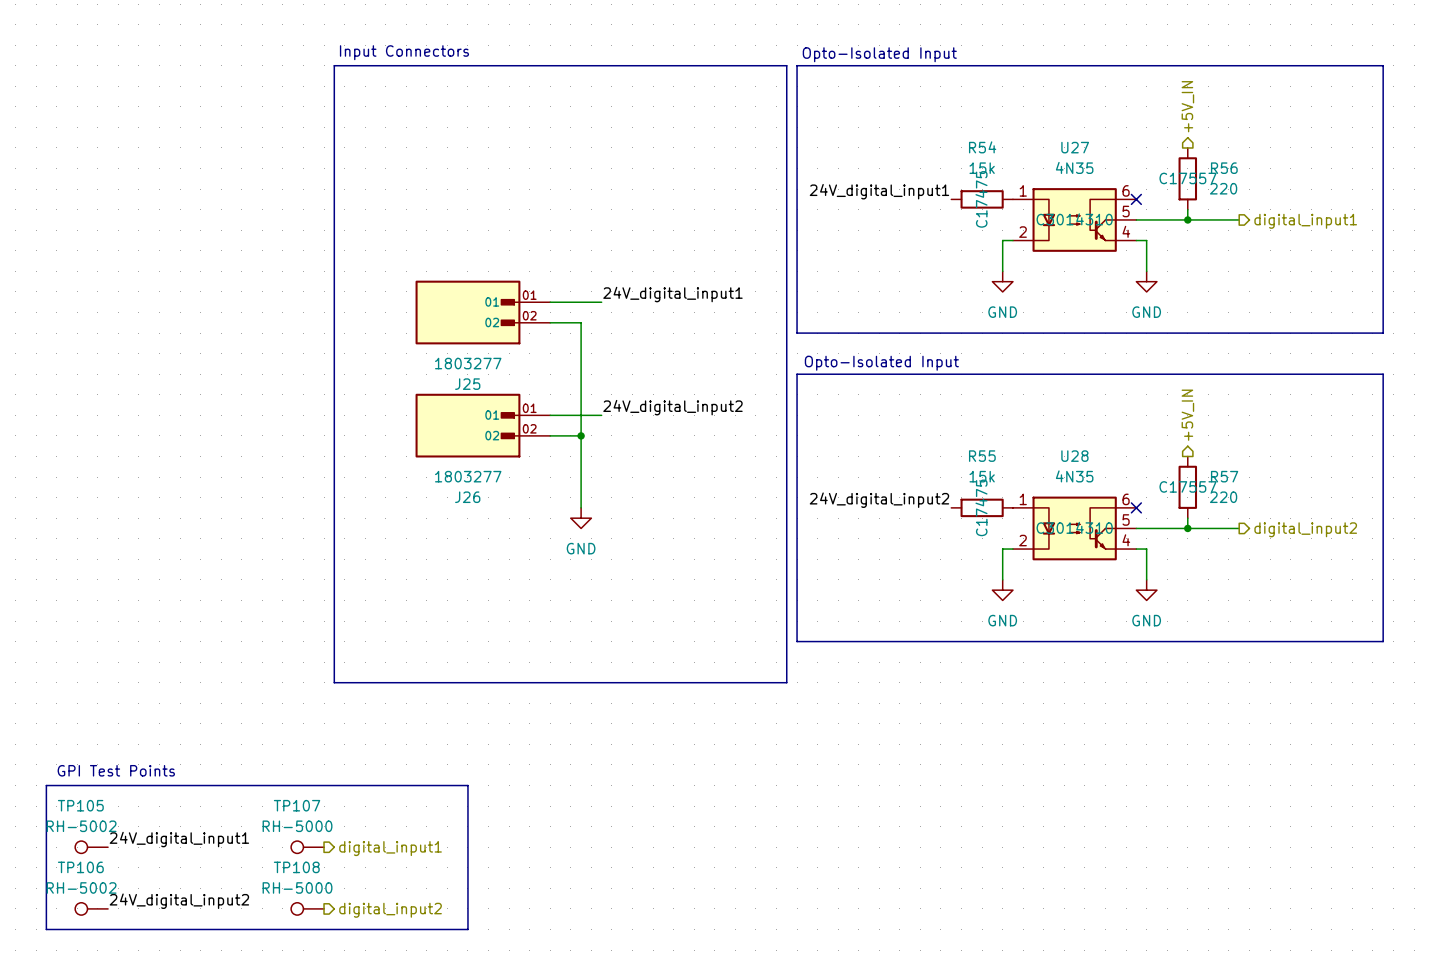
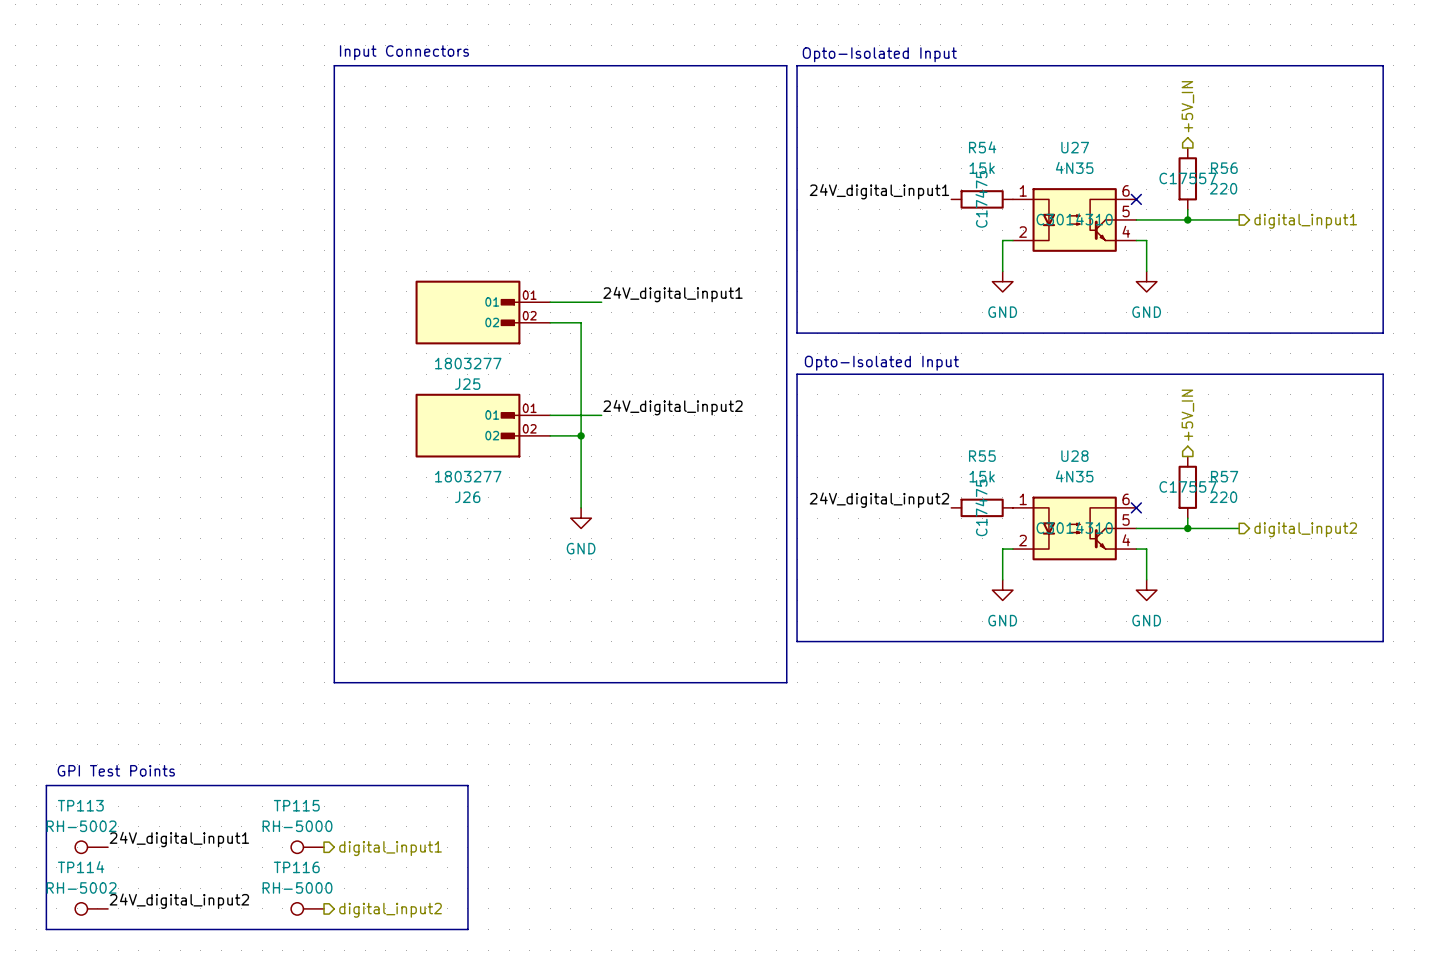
TP105 name: TP105 (80, 805) -> TP113 (80, 805)
TP107 name: TP107 (297, 805) -> TP115 (296, 805)
TP106 name: TP106 (80, 867) -> TP114 (81, 867)
TP108 name: TP108 (296, 867) -> TP116 (296, 867)

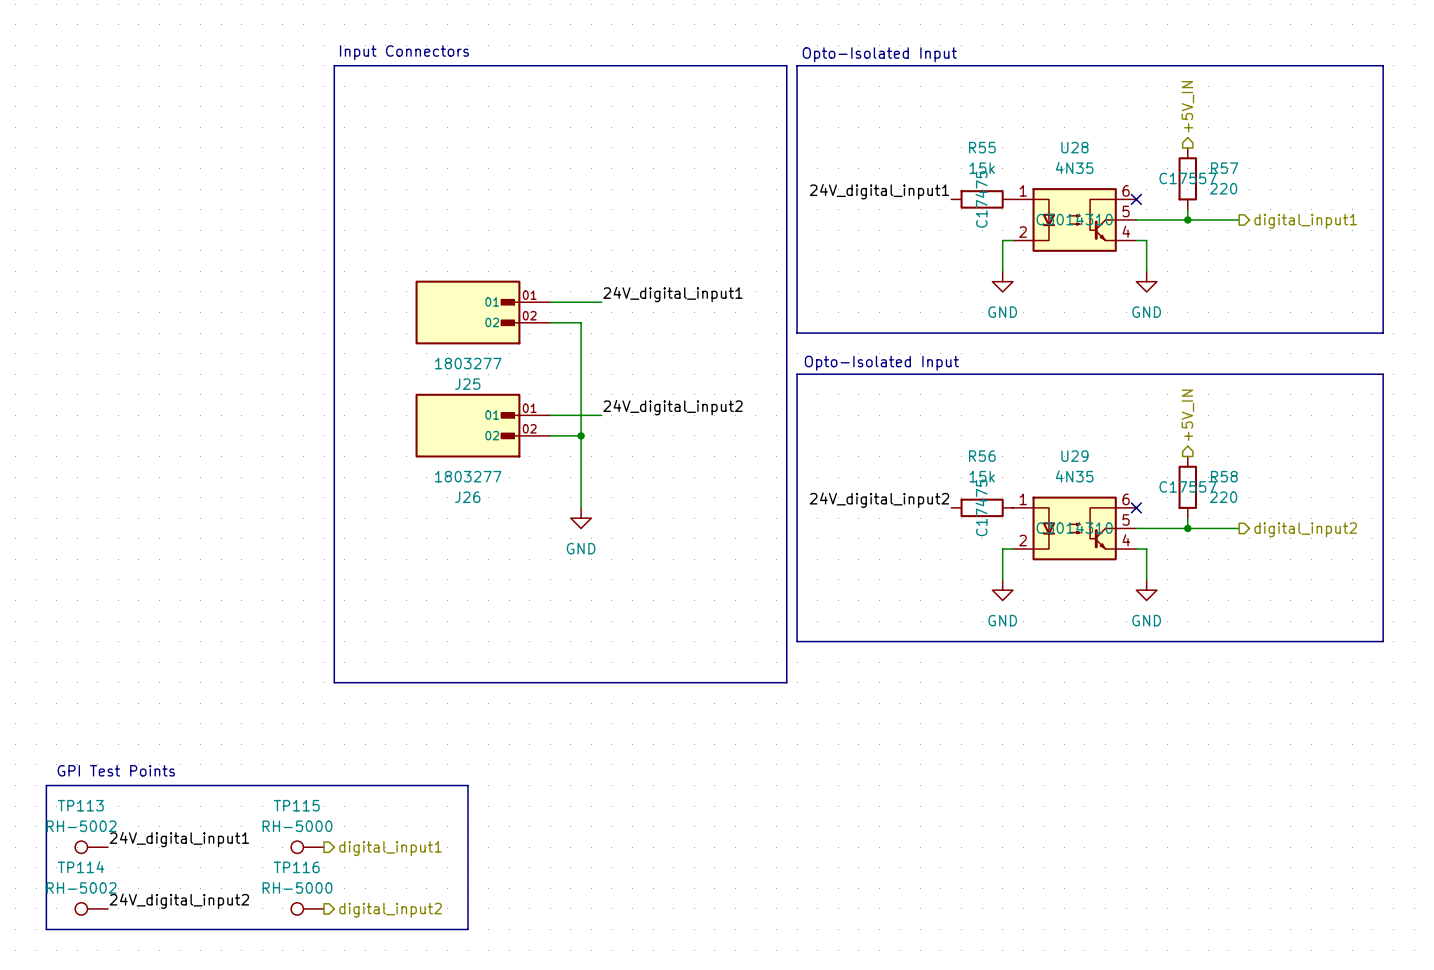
R54 name: R54 (982, 147) -> R55 (982, 147)
U27 name: U27 (1075, 147) -> U28 (1074, 147)
R56 name: R56 (1224, 168) -> R57 (1224, 168)
R55 name: R55 (982, 456) -> R56 (982, 456)
U28 name: U28 (1074, 456) -> U29 (1074, 456)
R57 name: R57 (1224, 476) -> R58 (1224, 476)

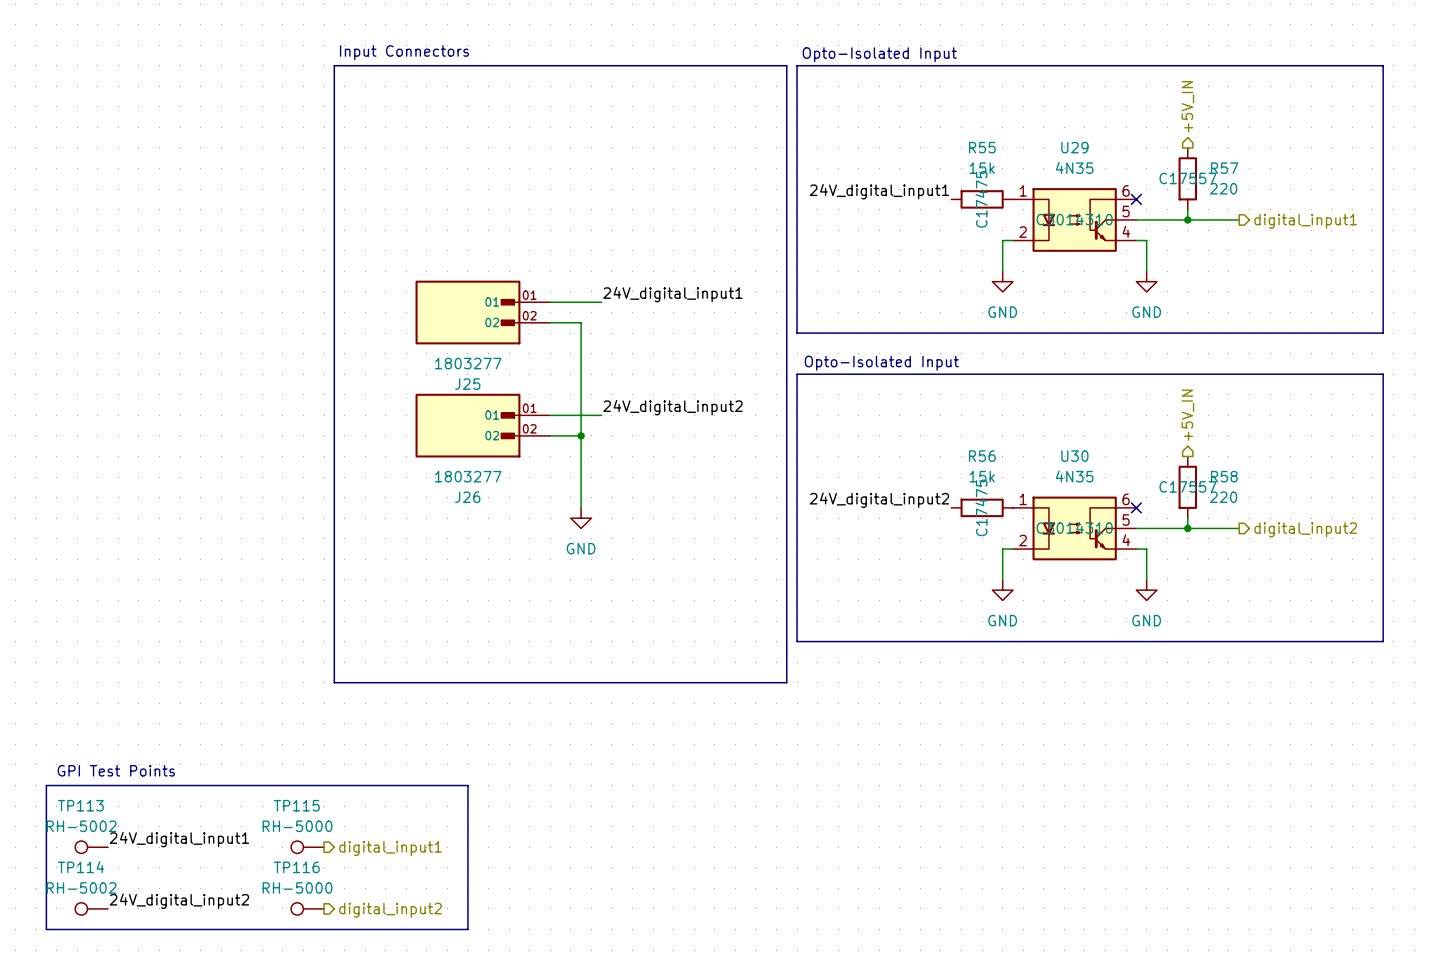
U28 name: U28 (1074, 147) -> U29 (1074, 147)
U29 name: U29 (1074, 456) -> U30 (1074, 456)

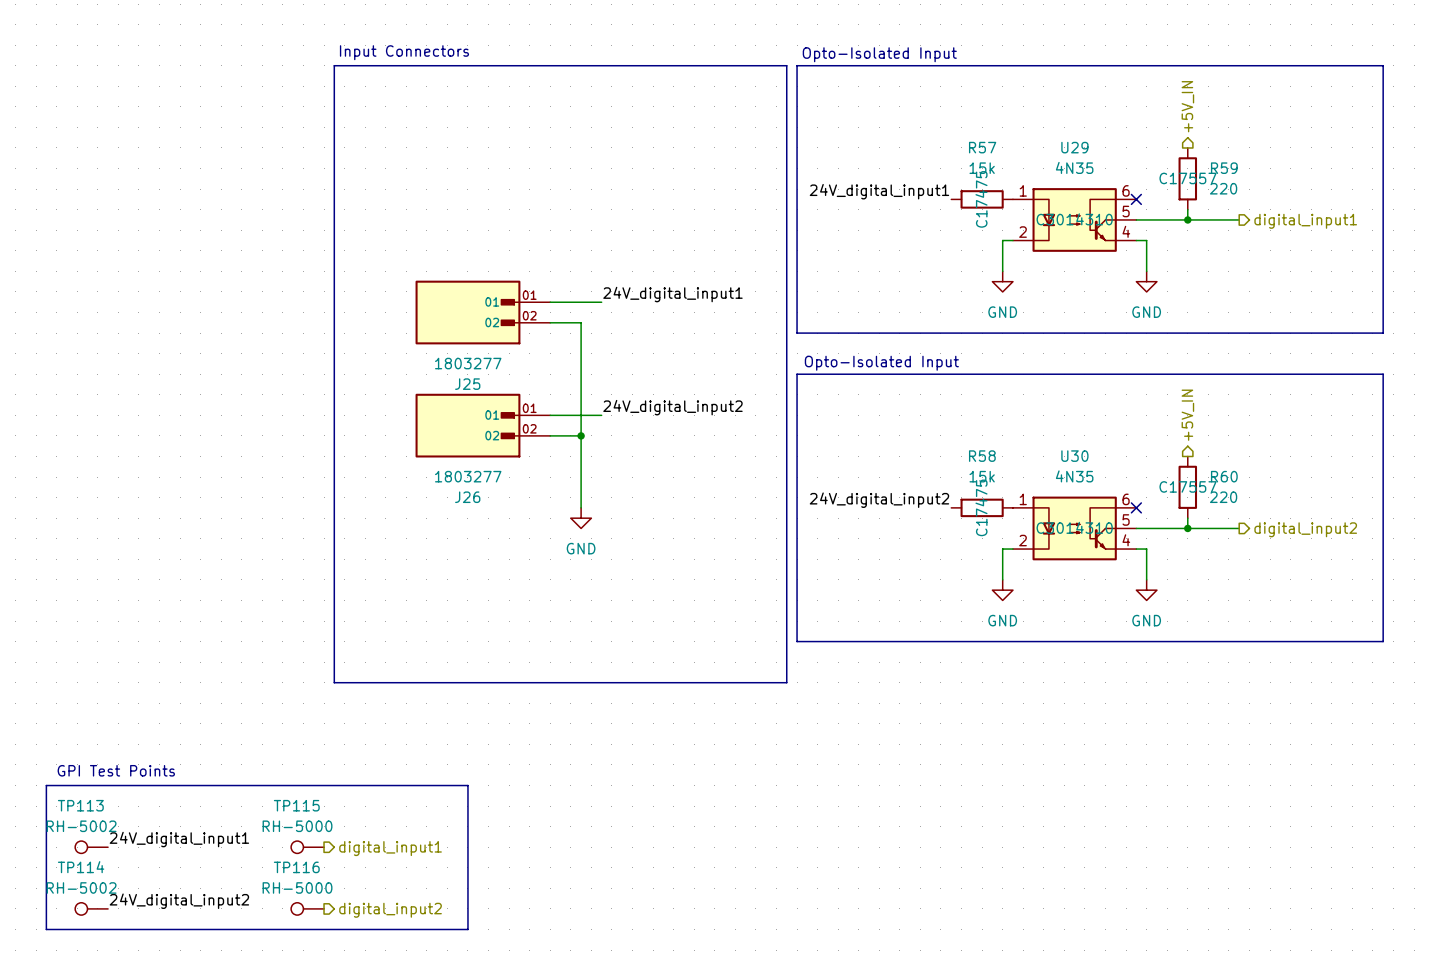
R55 name: R55 (982, 147) -> R57 (982, 147)
R57 name: R57 (1224, 168) -> R59 (1224, 168)
R56 name: R56 (982, 456) -> R58 (982, 456)
R58 name: R58 (1224, 476) -> R60 (1224, 476)

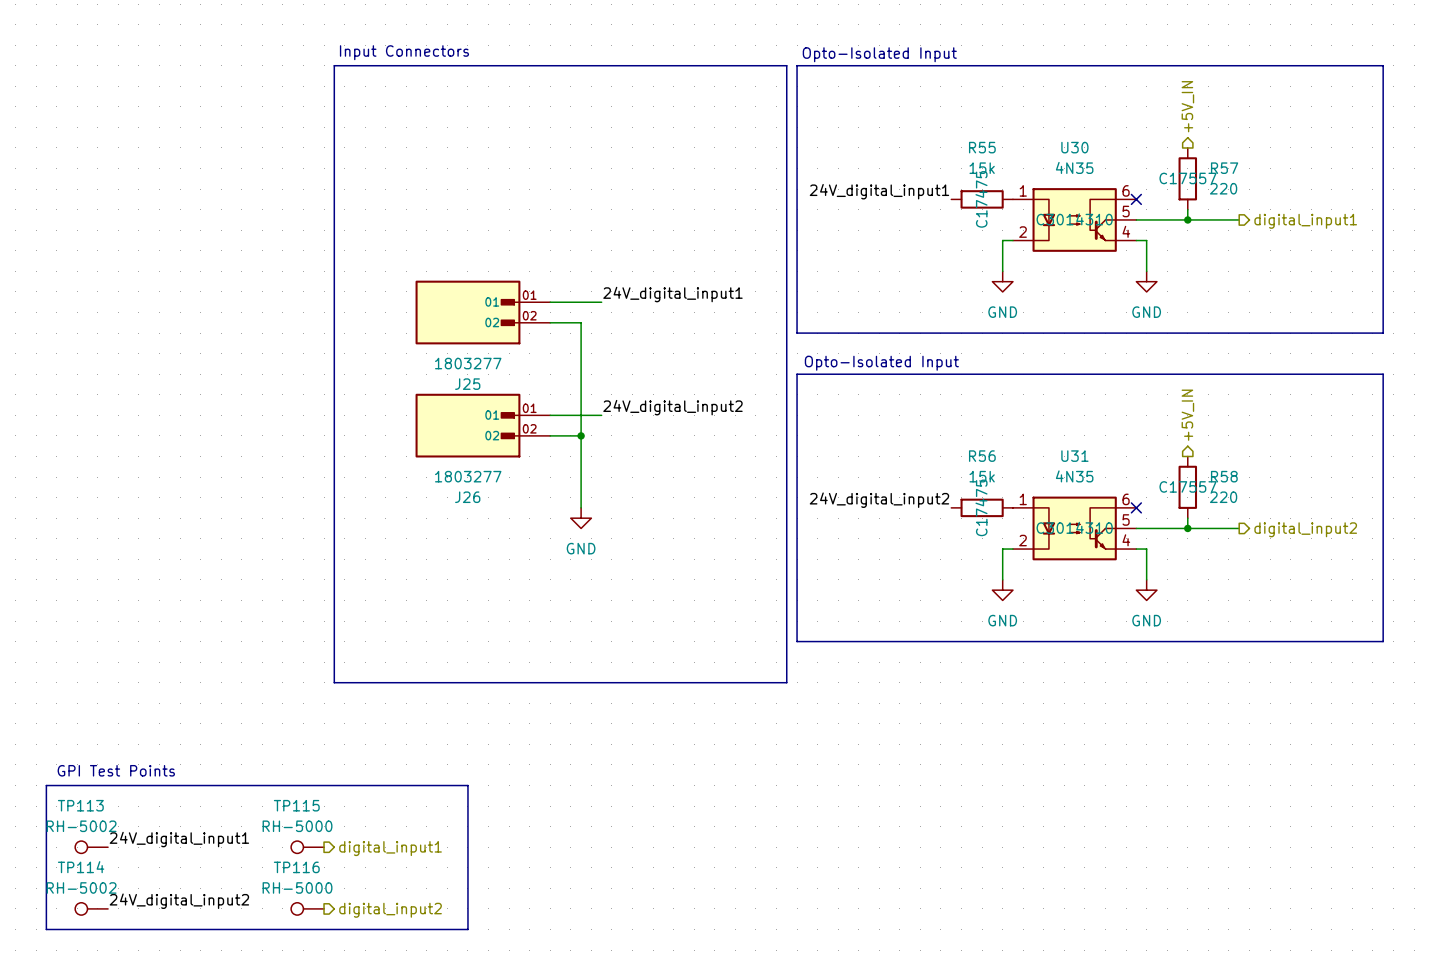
R57 name: R57 (982, 147) -> R55 (982, 147)
U29 name: U29 (1074, 147) -> U30 (1074, 147)
R59 name: R59 (1224, 168) -> R57 (1224, 168)
R58 name: R58 (982, 456) -> R56 (982, 456)
U30 name: U30 (1074, 456) -> U31 (1074, 456)
R60 name: R60 (1224, 476) -> R58 (1224, 476)

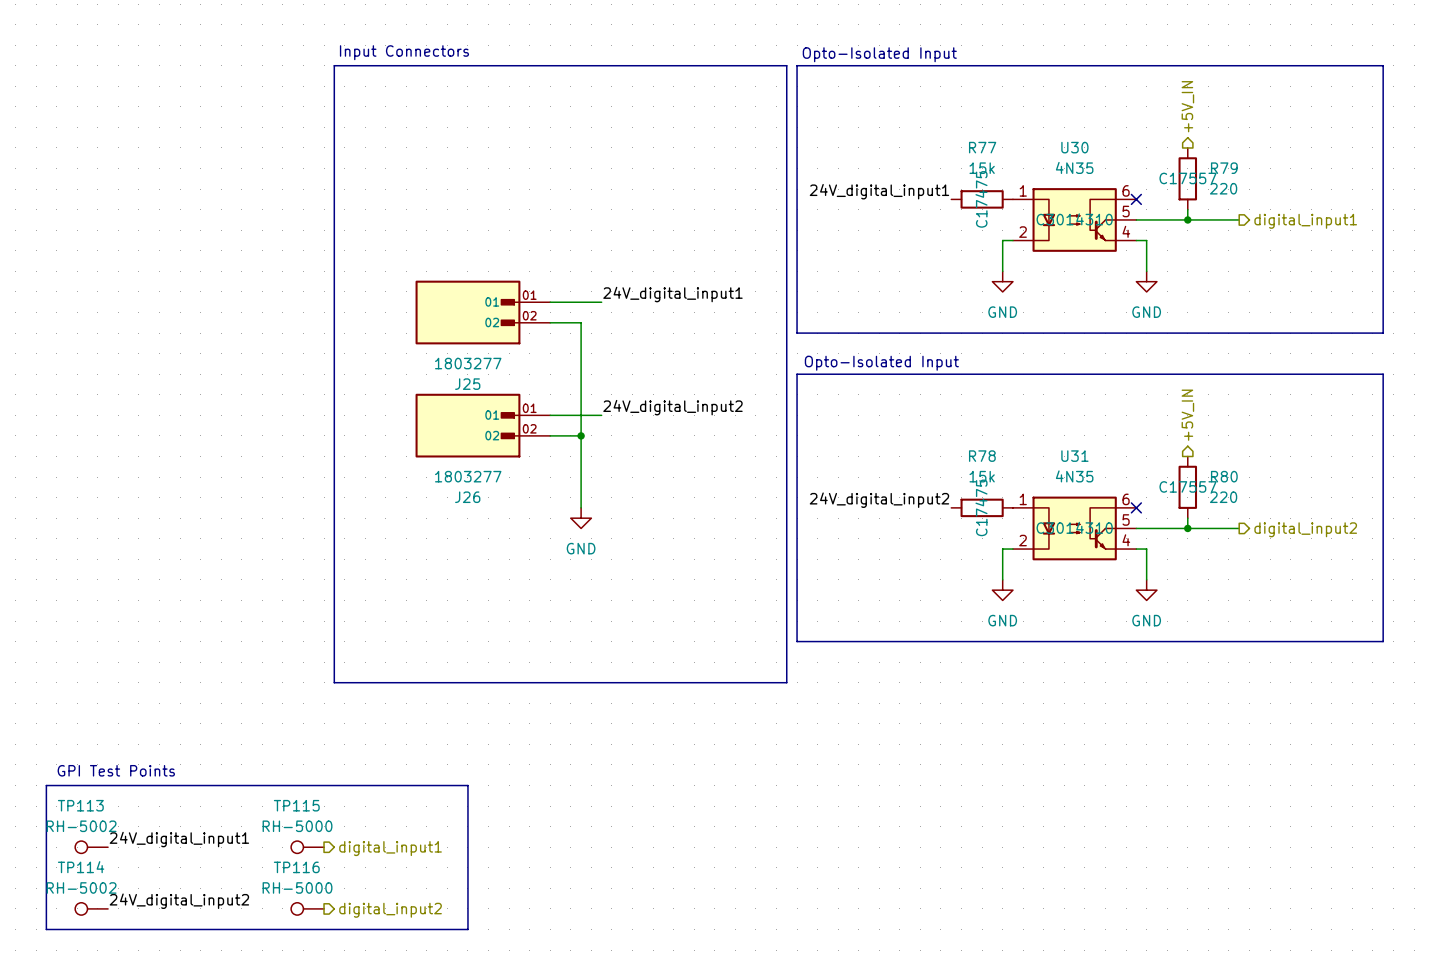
R55 name: R55 (982, 147) -> R77 (982, 147)
R57 name: R57 (1224, 168) -> R79 (1224, 168)
R56 name: R56 (982, 456) -> R78 (982, 456)
R58 name: R58 (1224, 476) -> R80 (1224, 476)

